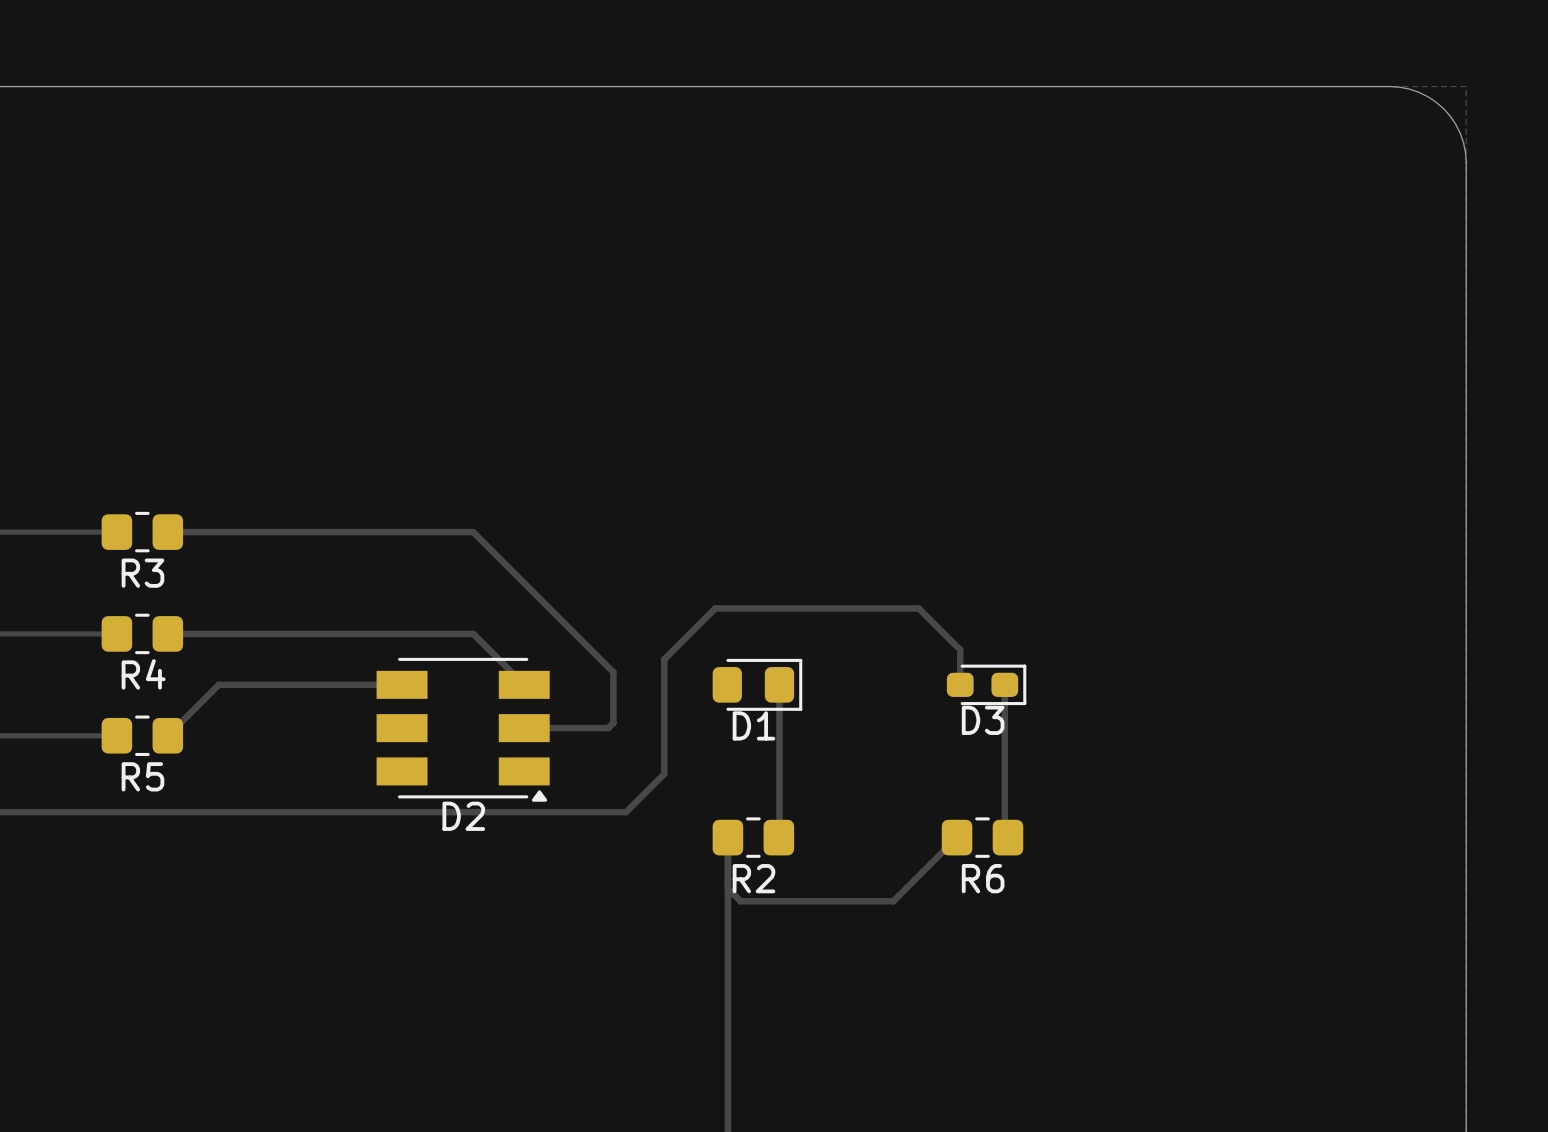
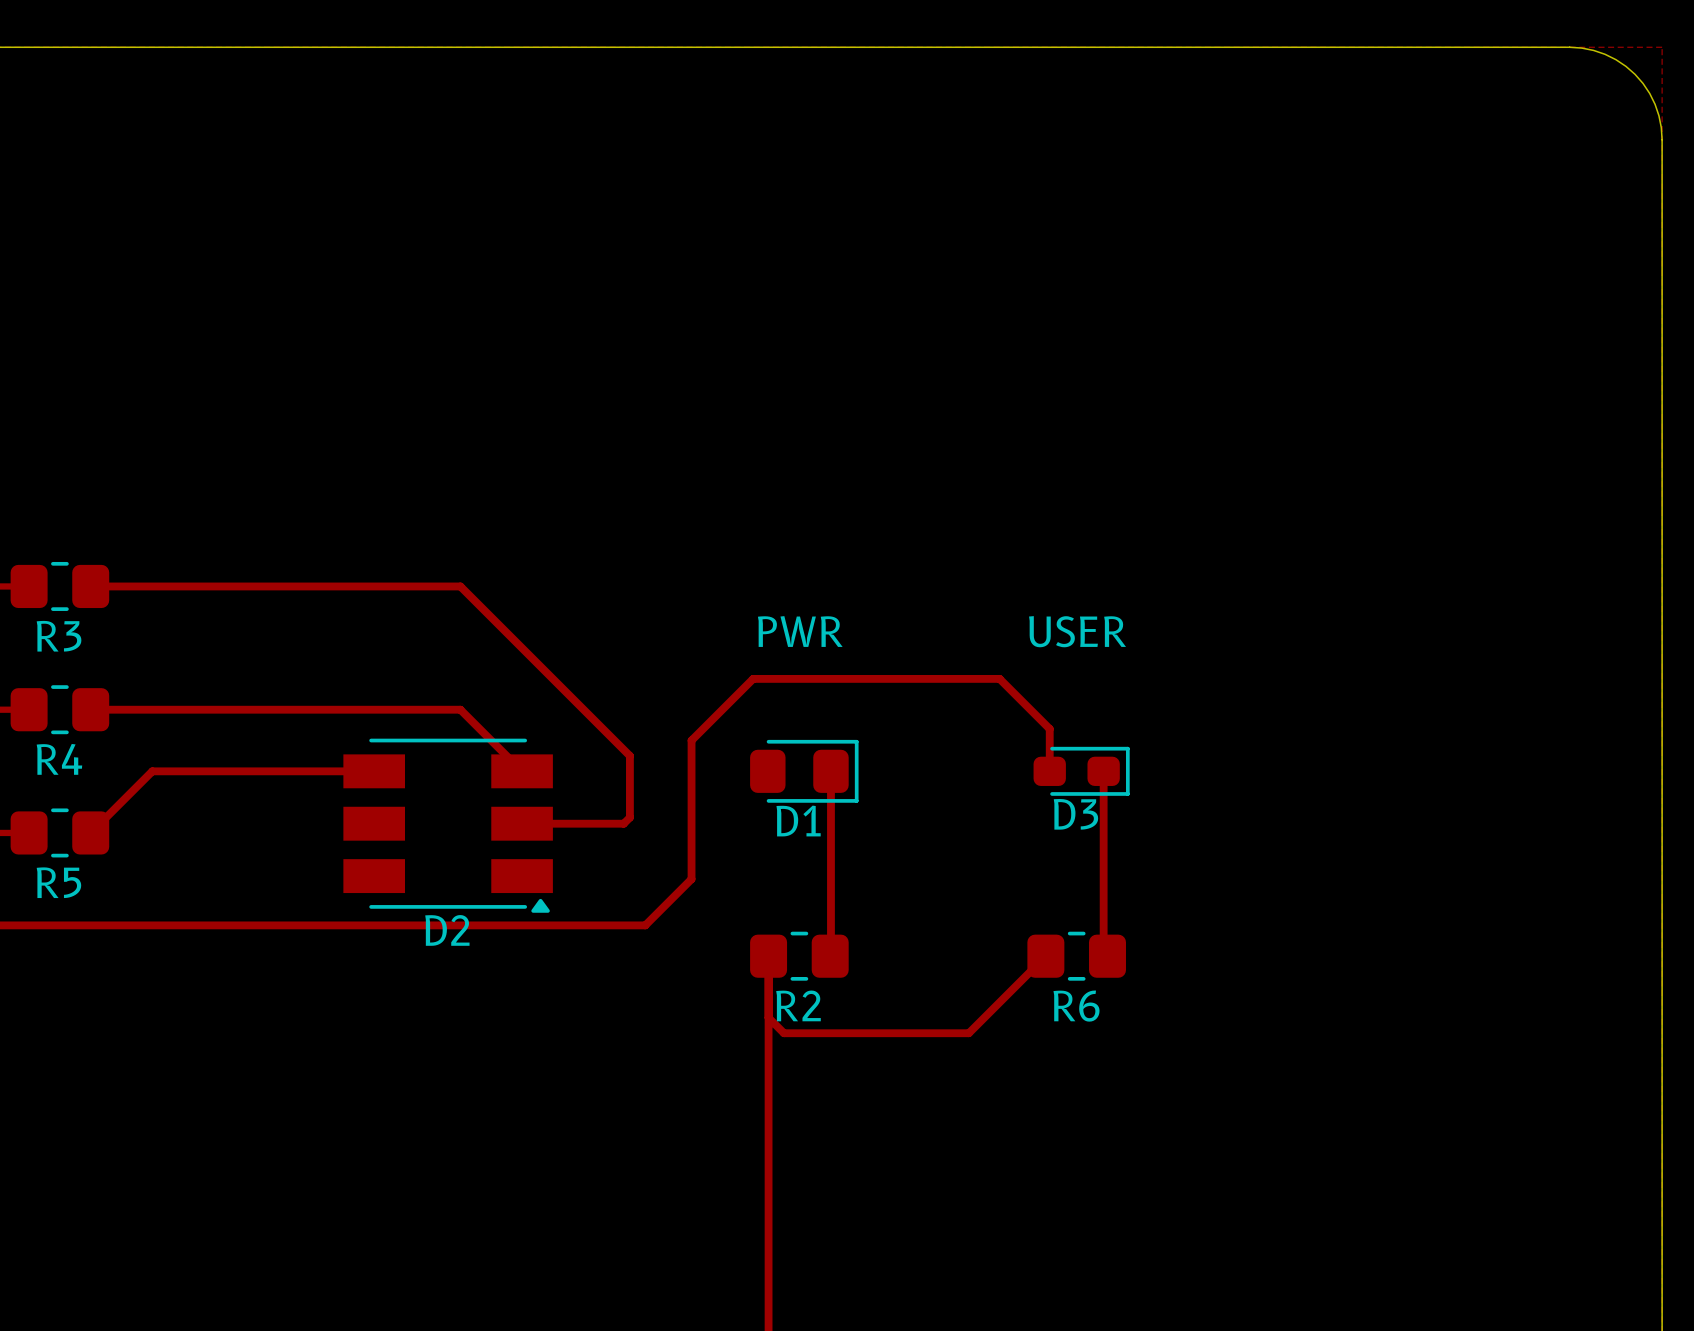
D1 value: none -> PWR (800, 631)
D3 value: none -> USER (1077, 631)

